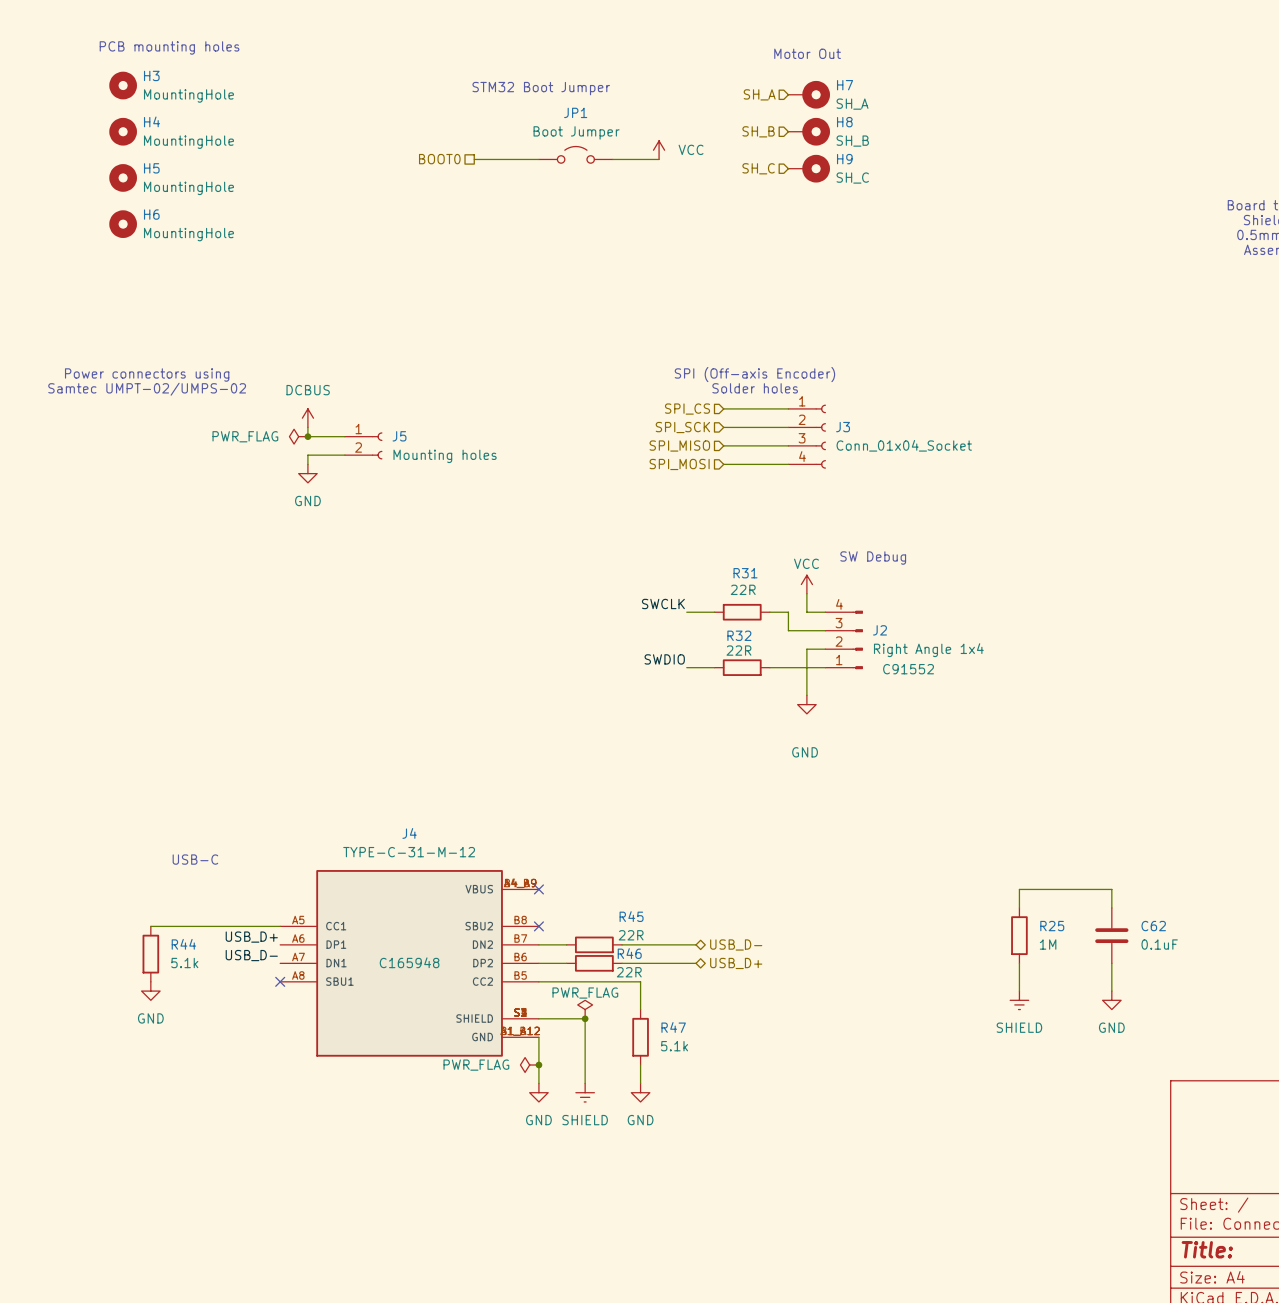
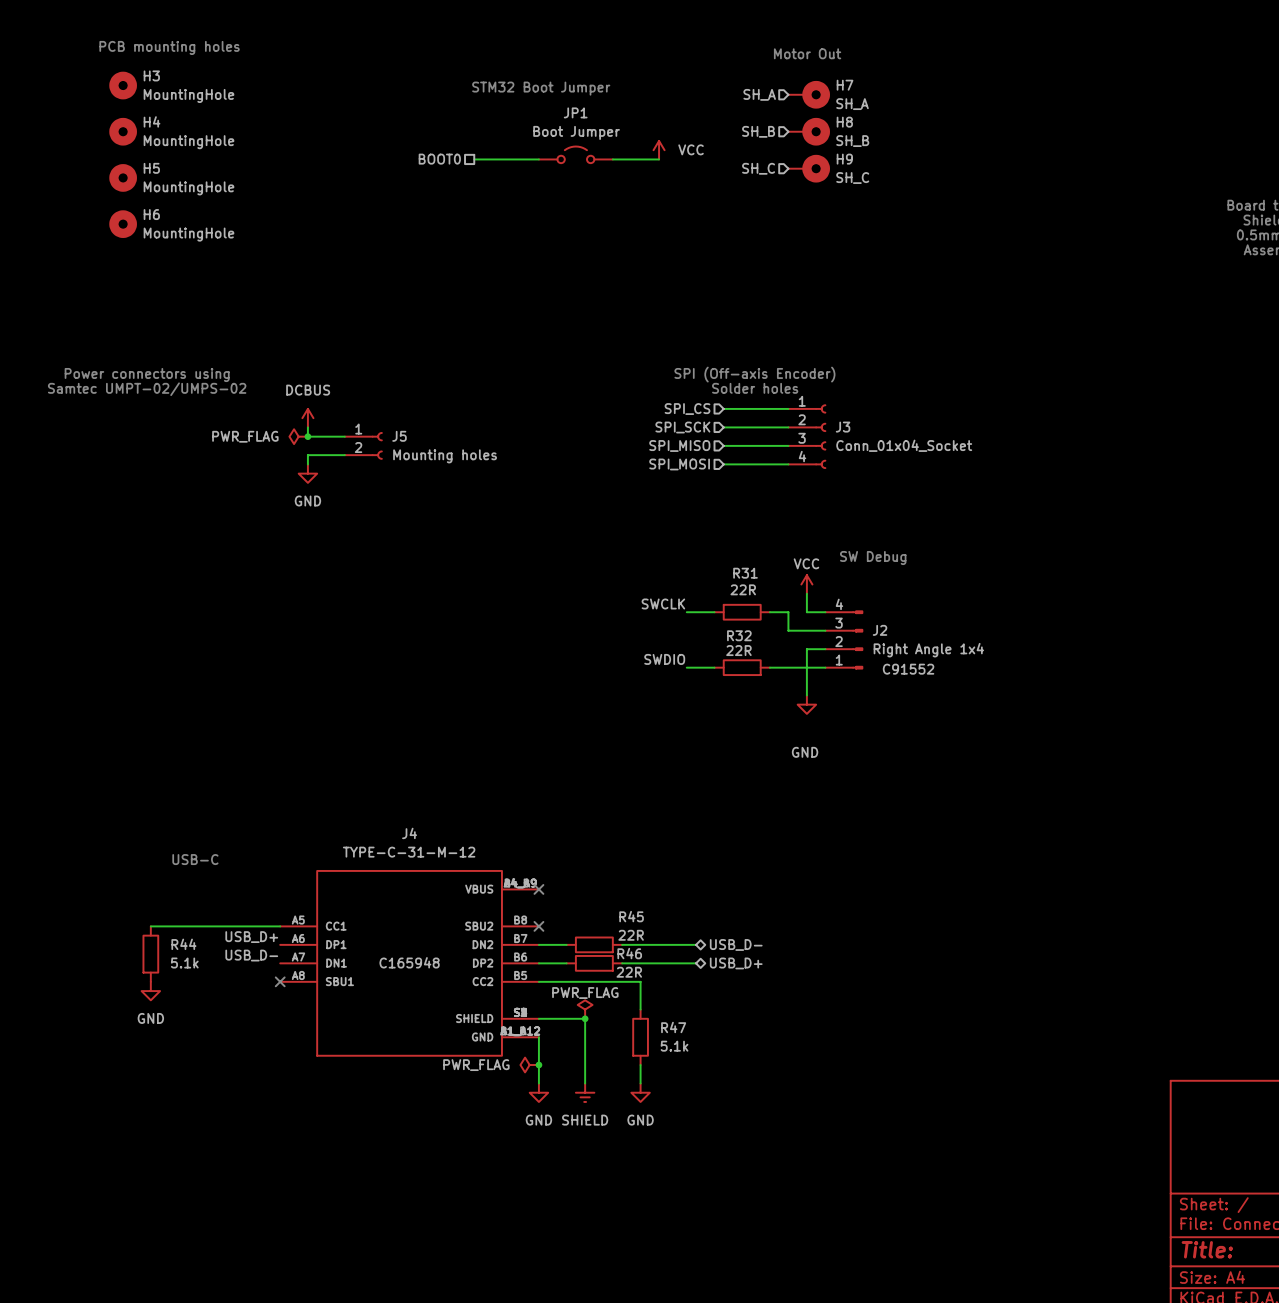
wire: (1019, 907) (1019, 889) (1111, 889) (1111, 907) -> none
R25: 1M (1019, 935) -> none
C62: 0.1uF (1111, 935) -> none
wire: (1019, 963) (1019, 991) -> none
wire: (1111, 963) (1111, 991) -> none
power symbol: SHIELD (1019, 1000) -> none
power symbol: GND (1111, 1000) -> none

